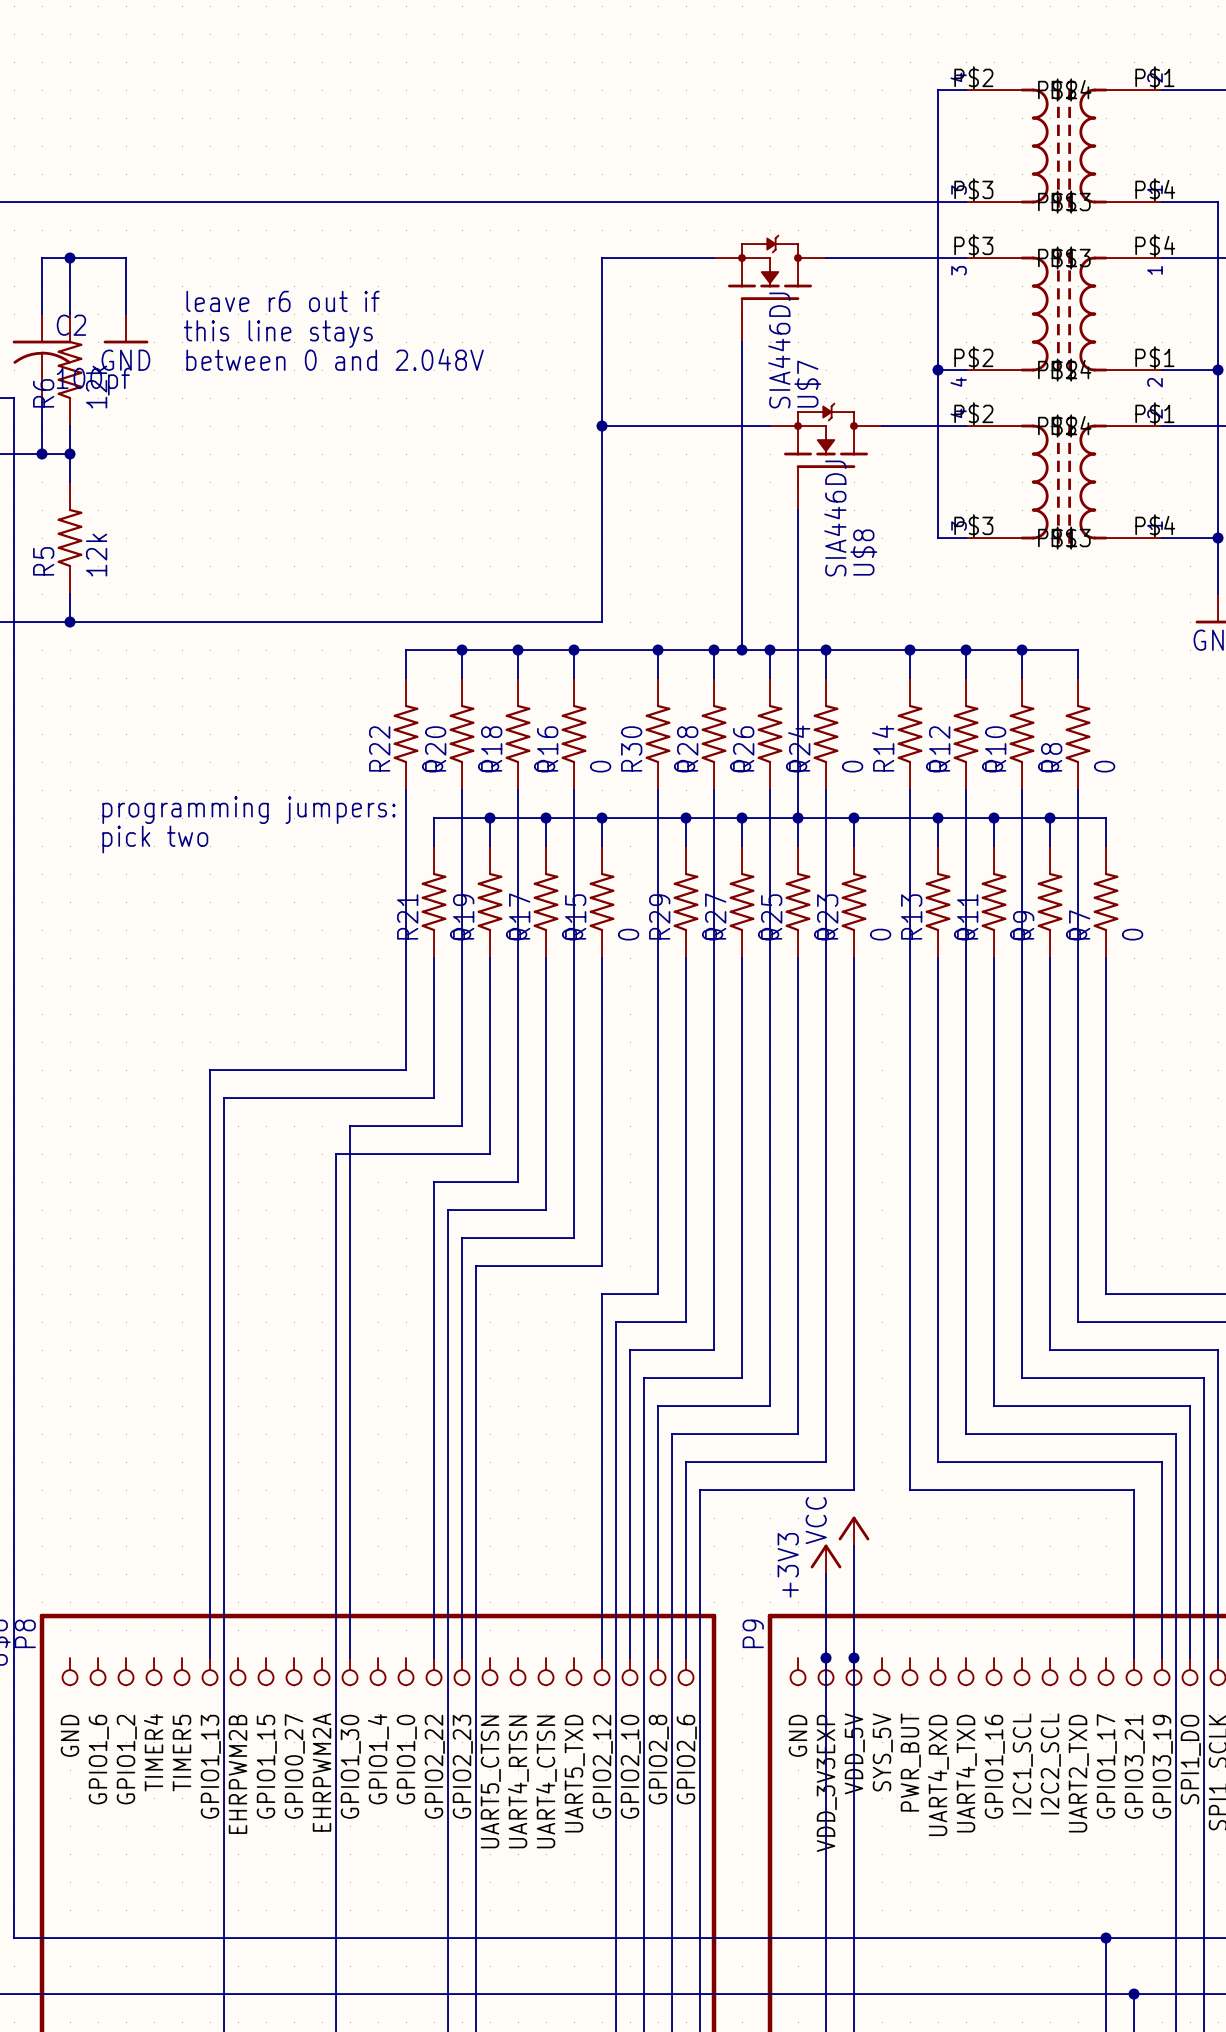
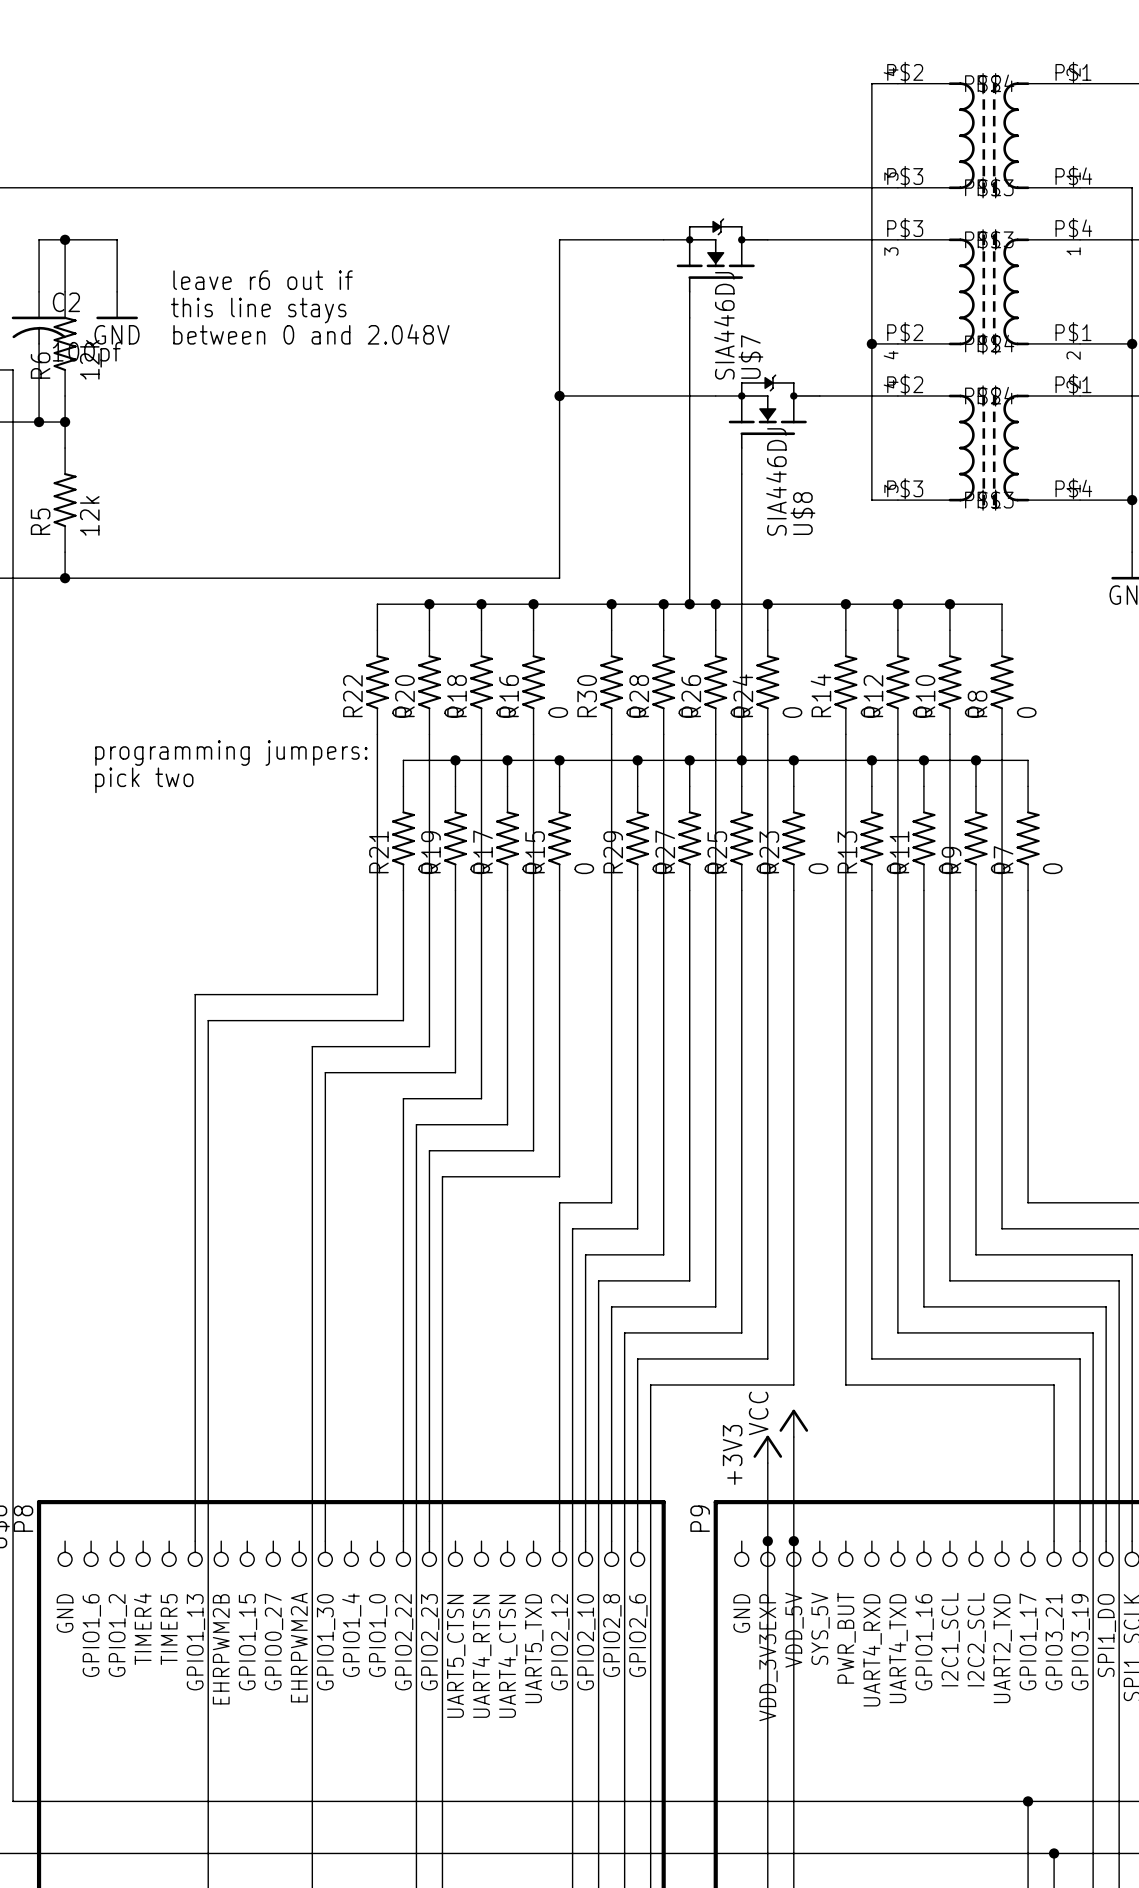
wire: (350, 1126) (350, 1154) (336, 1154) -> (325, 1046) (312, 1046) (312, 1072)

